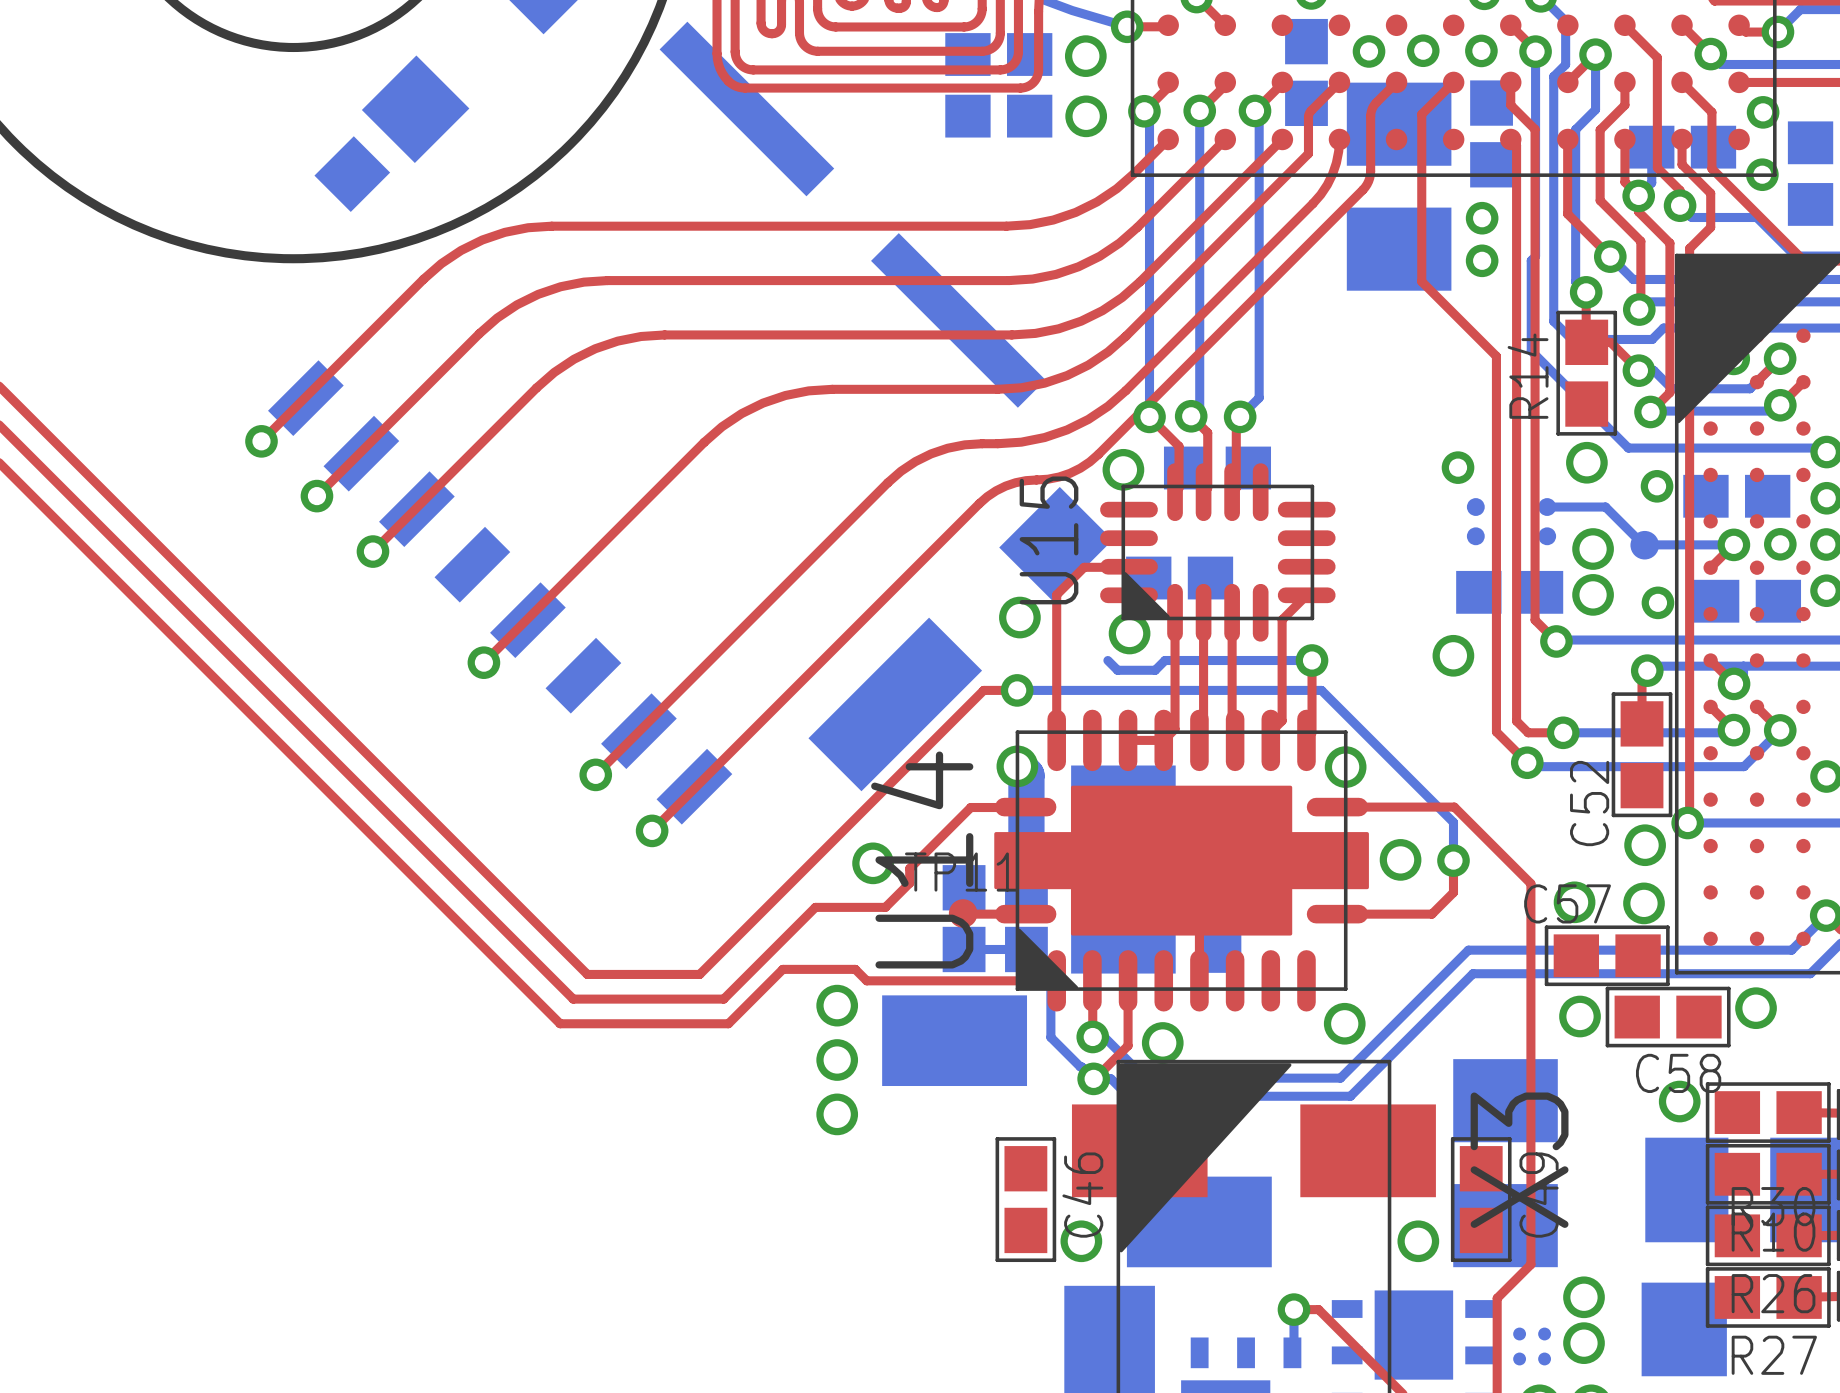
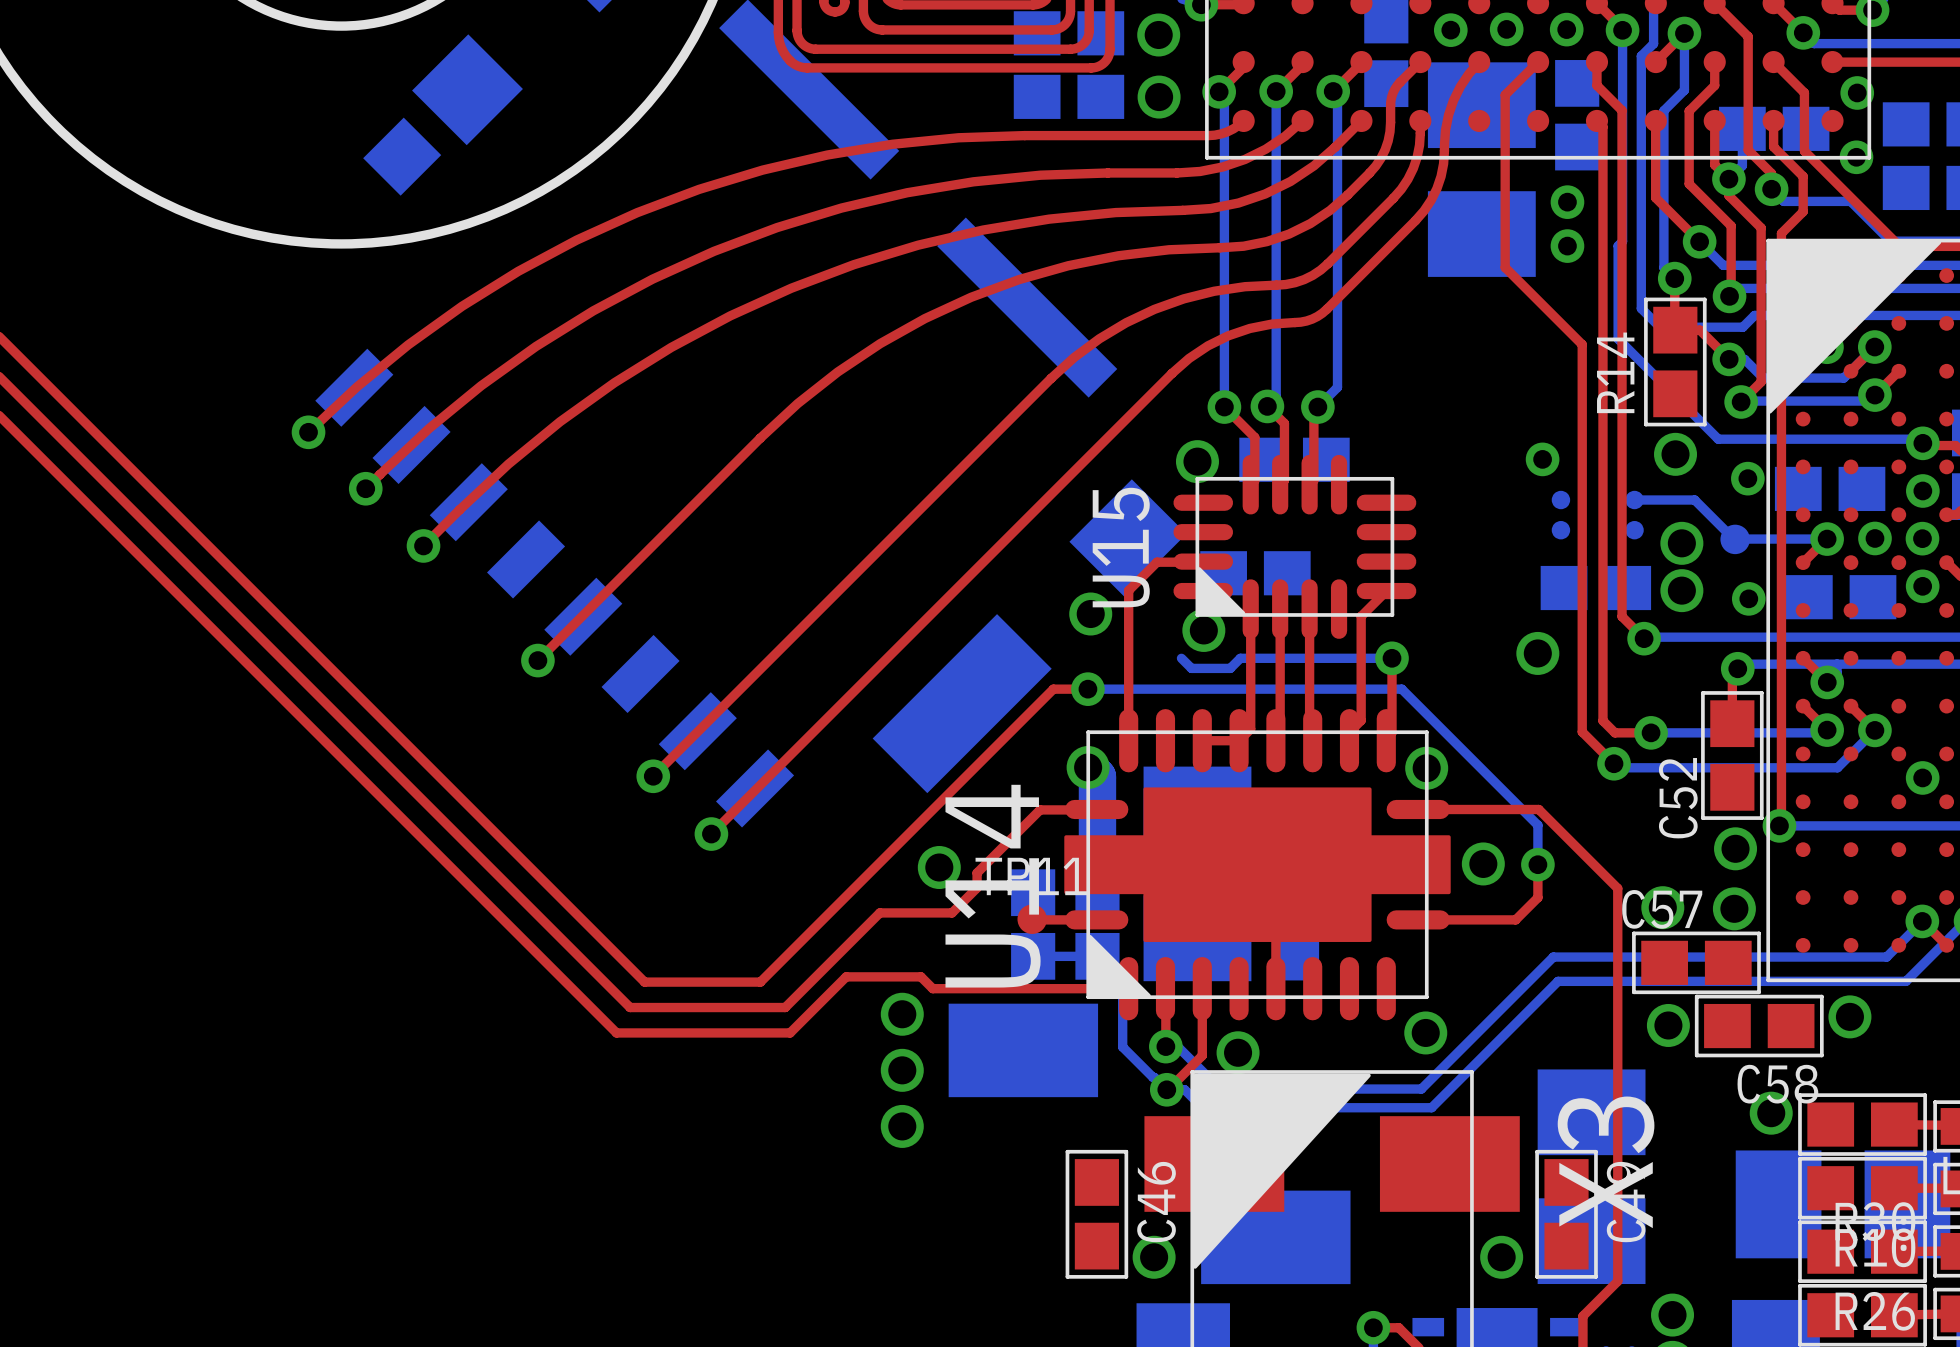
top track: (1396, 82) (1374, 104) (1371, 111) (1370, 174) (1362, 189) (1089, 461) (1059, 476) (1026, 480) (1005, 486) (979, 503) -> (1479, 62) (1460, 86) (1453, 100) (1445, 130) (1441, 176) (1431, 200) (1415, 220) (1317, 316) (1300, 322) (1272, 324) (1249, 328) (1228, 335) (1189, 358) (1048, 496)
top track: (1319, 101) (1308, 114) (1308, 153) (1125, 336) (1108, 351) (1088, 365) (1067, 375) (1044, 383) (1021, 387) (832, 389) (808, 390) (785, 395) (762, 403) (741, 413) (721, 426) (699, 447) -> (1400, 82) (1391, 96) (1389, 131) (1381, 158) (1369, 172) (1347, 194) (1330, 210) (1310, 223) (1289, 234) (1266, 241) (1243, 246) (1169, 249) (1118, 255) (1068, 265) (1019, 279) (971, 297) (924, 318) (880, 343) (837, 371) (797, 403) (760, 438)
top track: (1168, 139) (1134, 173) (1116, 188) (1097, 201) (1075, 212) (1053, 220) (1030, 224) (551, 226) (528, 227) (504, 232) (482, 239) (461, 250) (441, 263) (261, 441) -> (1243, 120) (1233, 128) (1214, 135) (1024, 135) (958, 137) (892, 144) (827, 155) (762, 170) (699, 189) (637, 212) (576, 240) (518, 271) (462, 306) (408, 344) (356, 386) (308, 432)
top track: (1225, 139) (1119, 243) (1099, 256) (1078, 266) (1056, 274) (1032, 279) (1009, 280) (607, 280) (583, 282) (560, 286) (538, 294) (516, 304) (497, 318) (479, 333) (330, 482) -> (1302, 120) (1285, 136) (1265, 149) (1244, 159) (1222, 166) (1200, 171) (1176, 172) (1040, 175) (973, 181) (907, 192) (841, 208) (777, 227) (713, 251) (652, 279) (593, 310) (535, 346) (481, 385) (429, 428) (379, 474)
top track: (1339, 139) (1336, 162) (1332, 174) (1320, 194) (1108, 406) (1088, 419) (1067, 429) (1044, 437) (1021, 442) (964, 444) (931, 453) (900, 471) (887, 482) -> (1420, 120) (1417, 157) (1408, 179) (1401, 189) (1320, 270) (1295, 282) (1245, 286) (1214, 291) (1183, 298) (1154, 309) (1126, 322) (1099, 338) (1074, 357) (954, 475)
top track: (1256, 164) (1122, 297) (1102, 310) (1081, 321) (1058, 328) (1035, 333) (1011, 334) (664, 334) (641, 336) (617, 341) (595, 348) (574, 359) (554, 372) (536, 388) (407, 516) -> (1335, 147) (1313, 165) (1290, 181) (1265, 193) (1238, 203) (1210, 208) (1115, 212) (1049, 219) (983, 230) (918, 245) (853, 264) (791, 288) (730, 315) (671, 347) (614, 382) (560, 421) (508, 464) (459, 509)

